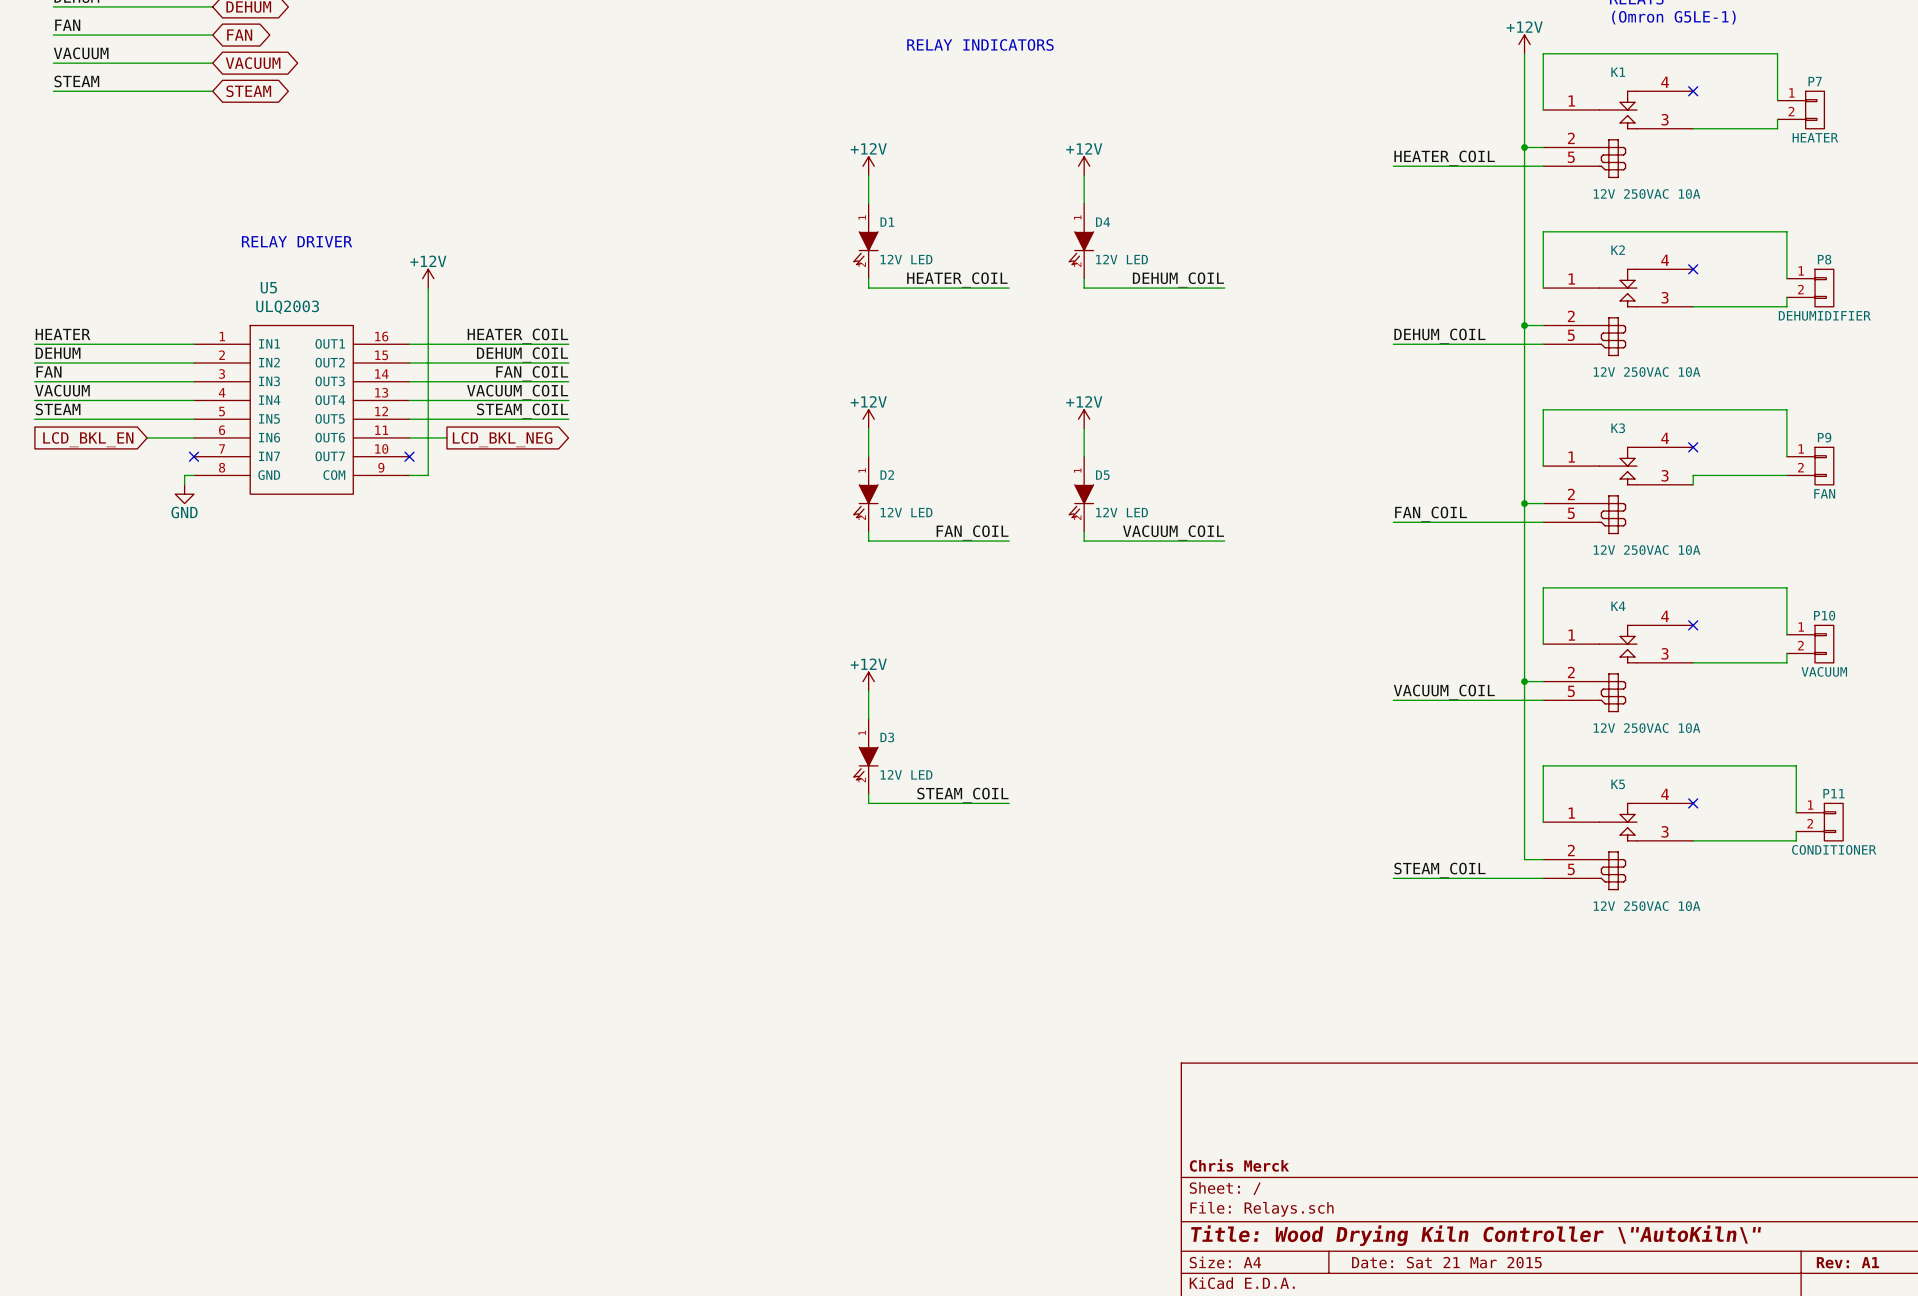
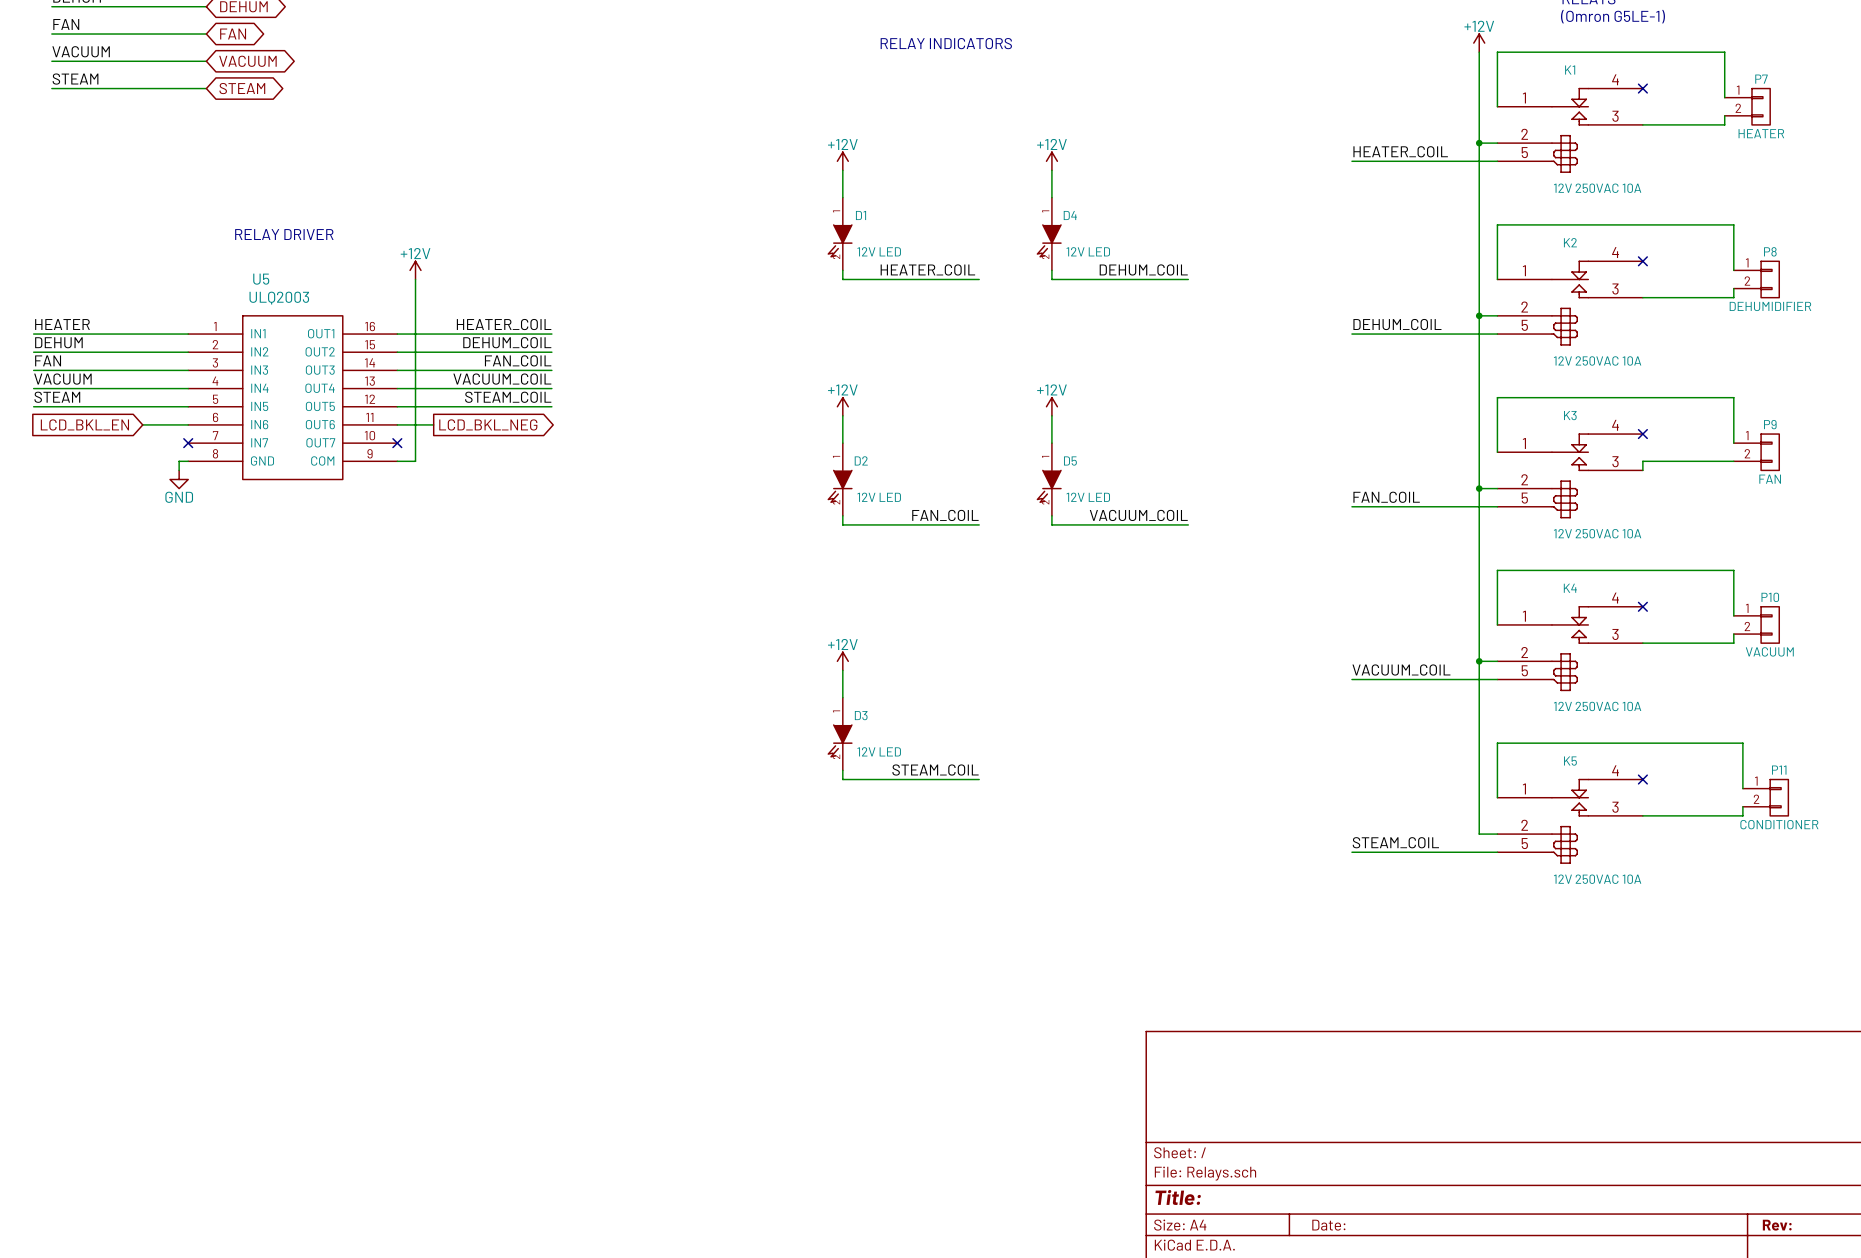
title block: Chris Merck (1239, 1165) -> none
title block: Title: Wood Drying Kiln Controller \"AutoKiln\" (1476, 1235) -> Title: (1178, 1197)
title block: Date: Sat 21 Mar 2015 (1446, 1262) -> Date: (1328, 1225)
title block: Rev: A1 (1847, 1262) -> Rev: (1777, 1225)

